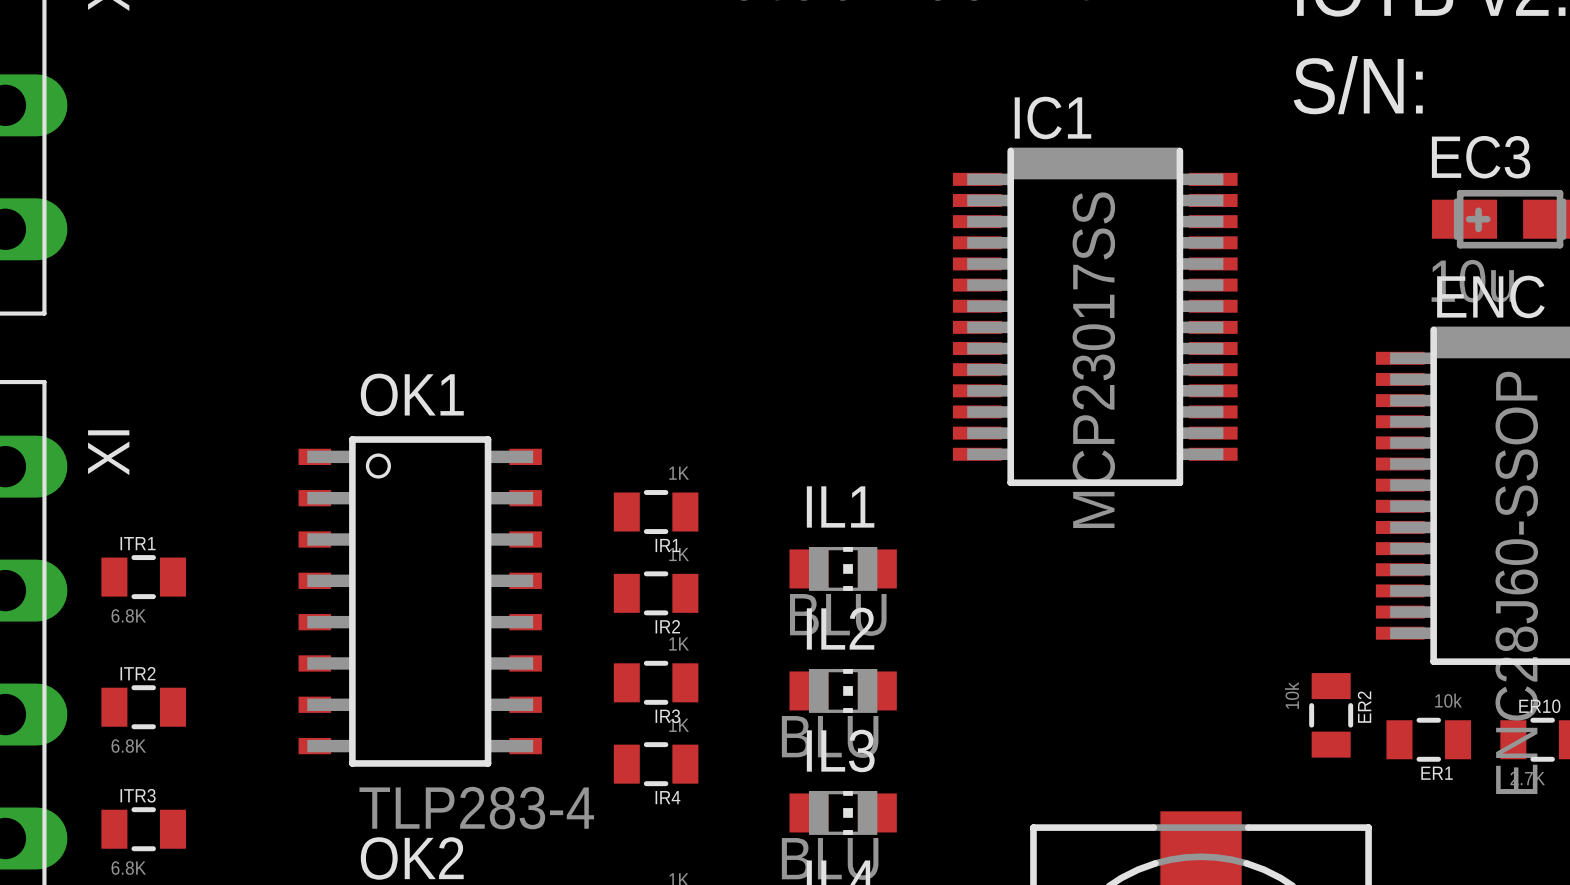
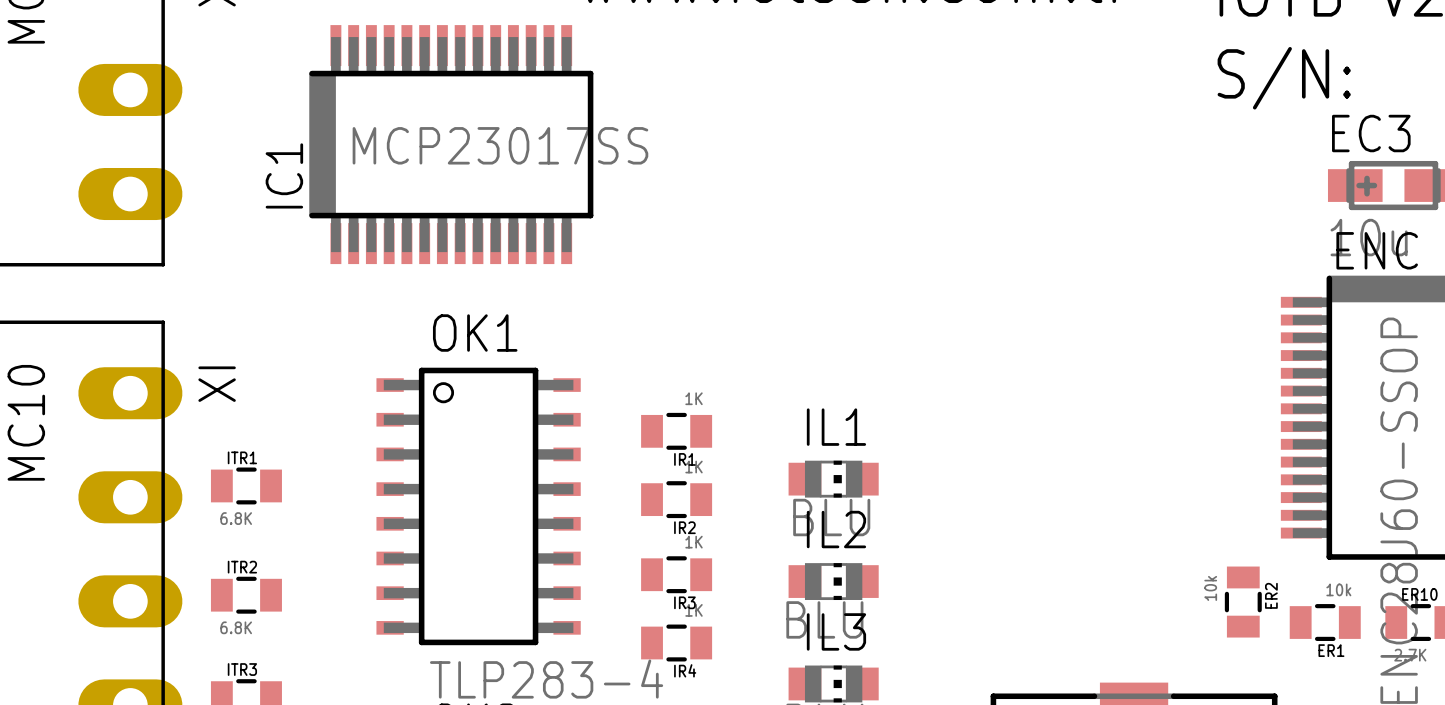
IC1 rotation: 0° (1095, 316) -> 90° counterclockwise (451, 144)
IC1 position: (1095, 316) -> (451, 144)

